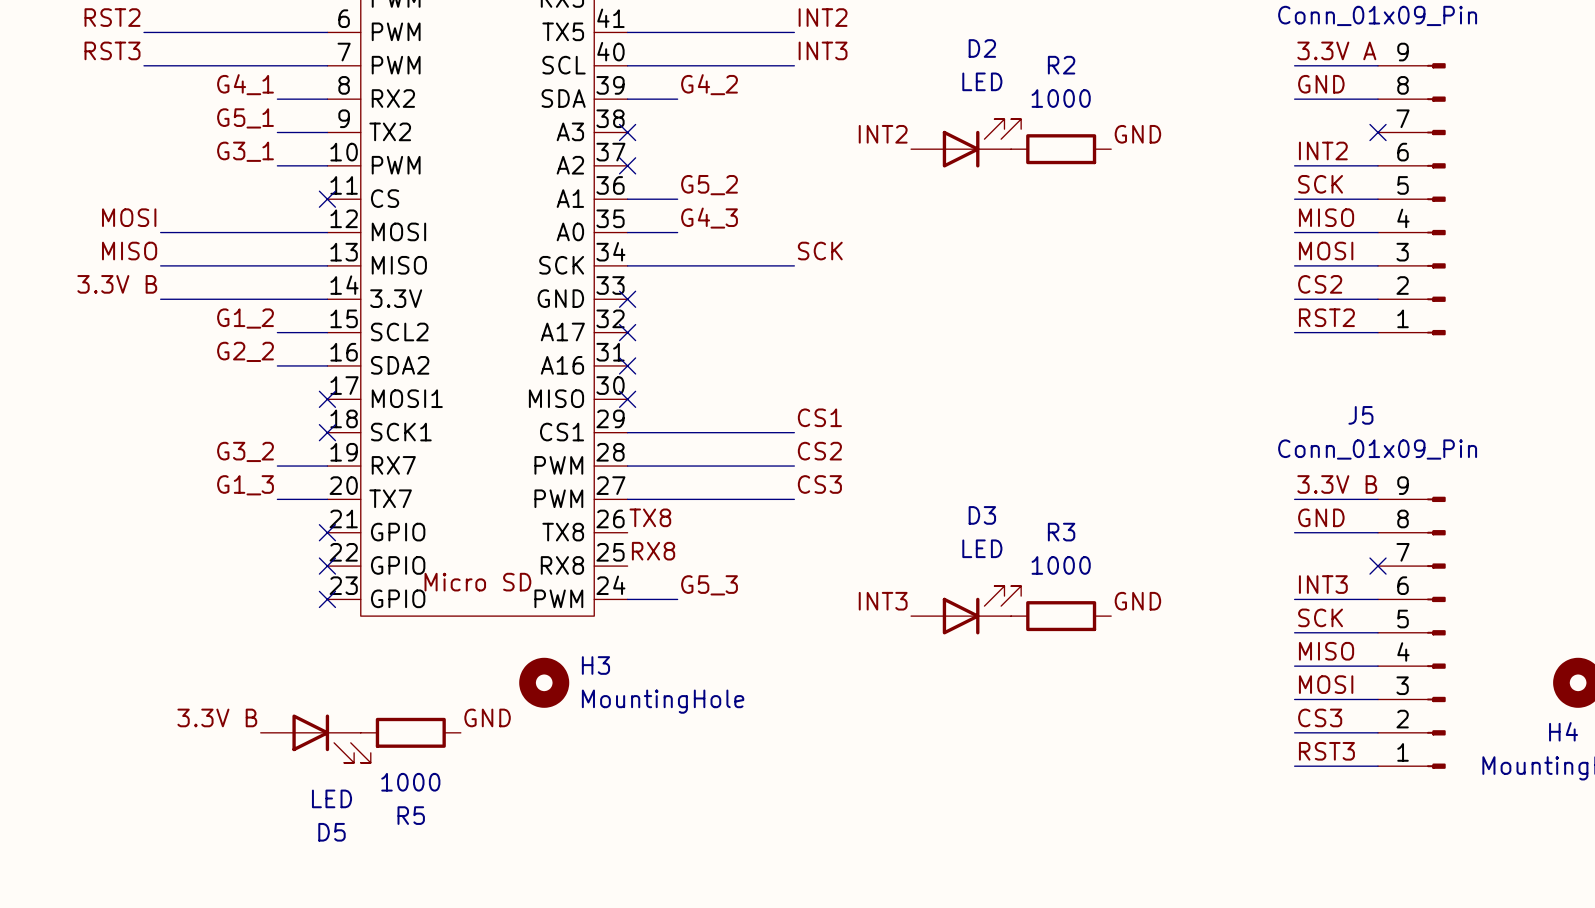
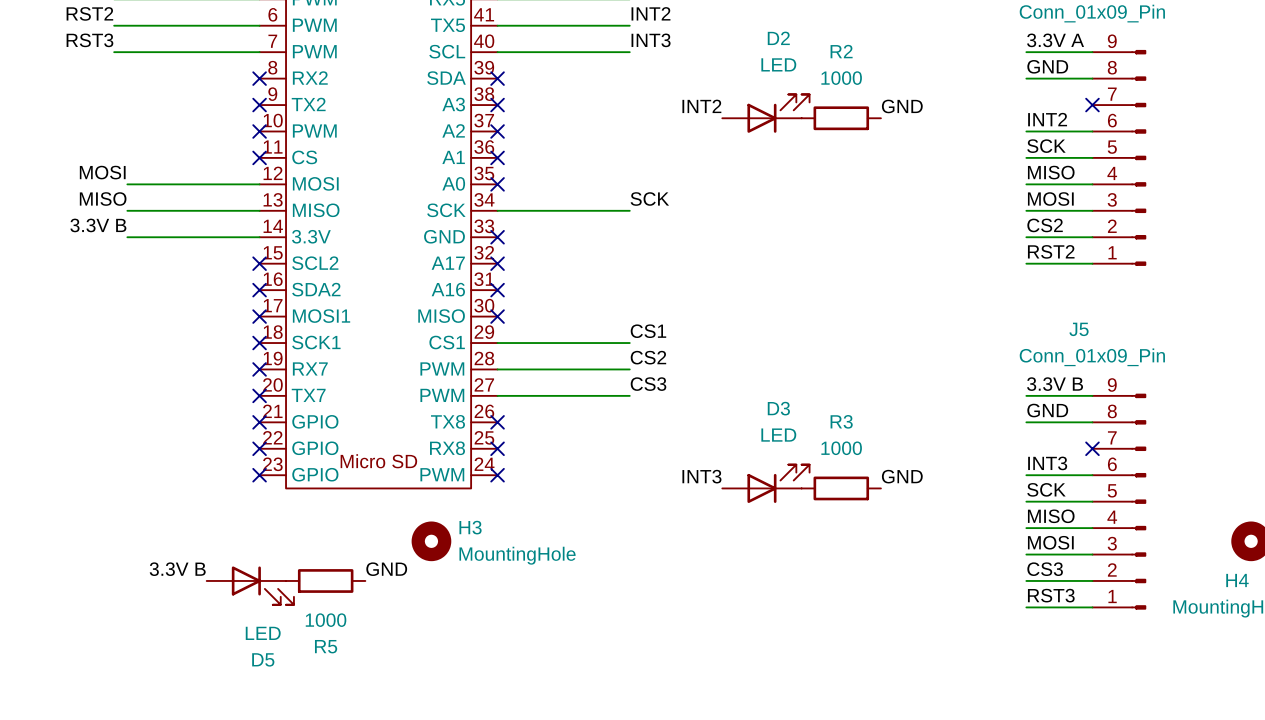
label: G4_1 (245, 84) -> none
label: G4_2 (709, 84) -> none
wire: (277, 99) (327, 99) -> none
no-connect mark: none -> (259, 78)
wire: (627, 99) (677, 99) -> none
no-connect mark: none -> (497, 78)
label: G5_1 (245, 118) -> none
wire: (277, 132) (327, 132) -> none
no-connect mark: none -> (259, 105)
label: G3_1 (245, 151) -> none
wire: (277, 165) (327, 165) -> none
no-connect mark: none -> (259, 131)
label: G5_2 (709, 185) -> none
wire: (627, 199) (677, 199) -> none
no-connect mark: none -> (497, 157)
label: G4_3 (709, 218) -> none
wire: (627, 232) (677, 232) -> none
no-connect mark: none -> (497, 184)
label: G1_2 (245, 318) -> none
wire: (277, 332) (327, 332) -> none
no-connect mark: none -> (259, 263)
label: G2_2 (245, 351) -> none
wire: (277, 365) (327, 365) -> none
no-connect mark: none -> (259, 290)
label: G3_2 (245, 451) -> none
wire: (277, 466) (327, 466) -> none
no-connect mark: none -> (259, 369)
label: G1_3 (245, 485) -> none
wire: (277, 499) (327, 499) -> none
no-connect mark: none -> (259, 395)
label: TX8 (650, 517) -> none
no-connect mark: none -> (497, 422)
label: RX8 (653, 551) -> none
no-connect mark: none -> (497, 448)
label: G5_3 (709, 585) -> none
wire: (627, 599) (677, 599) -> none
no-connect mark: none -> (497, 475)

